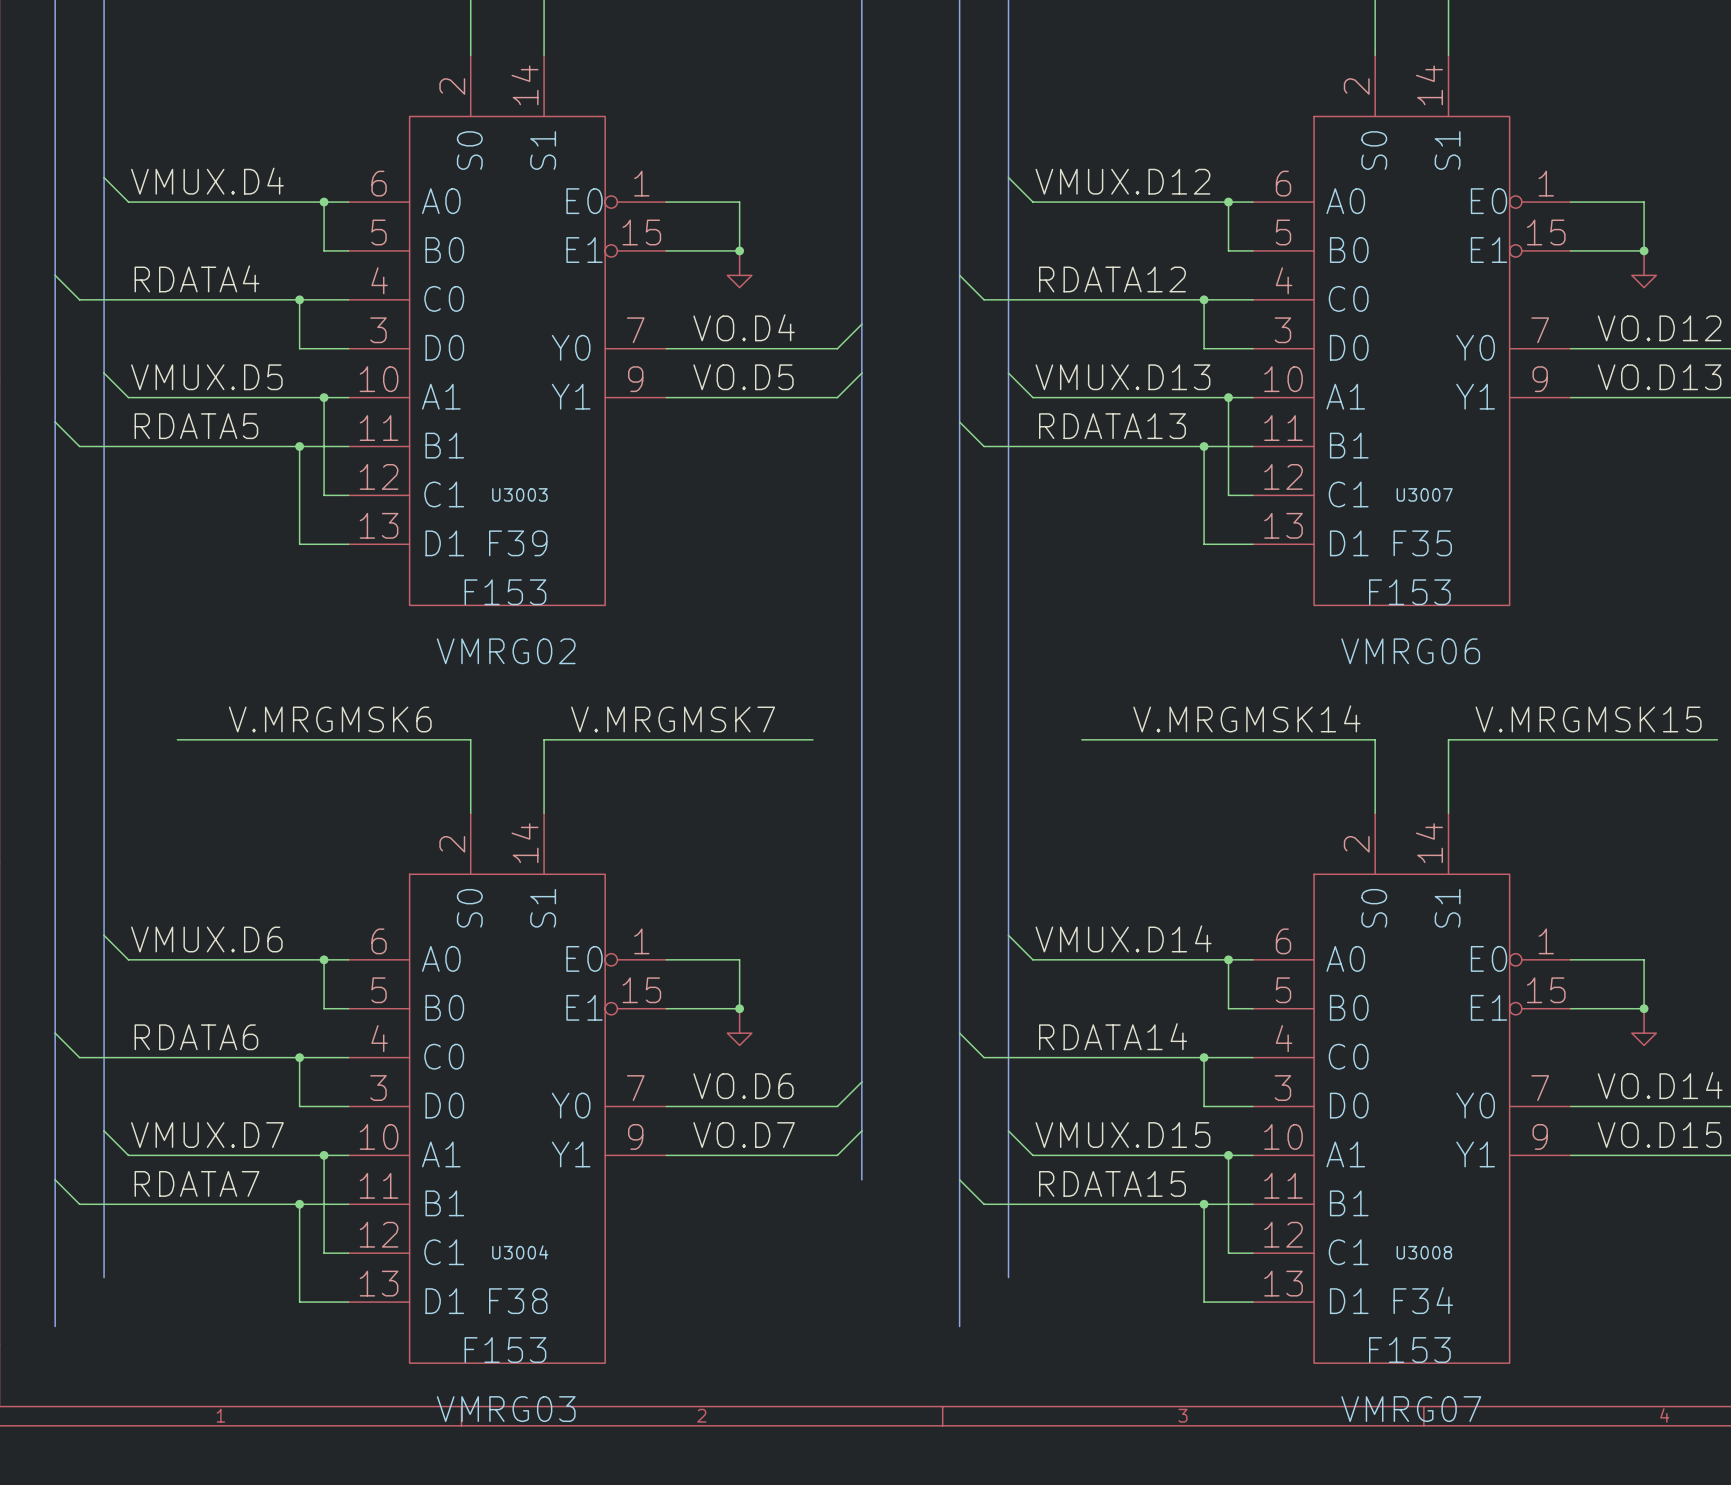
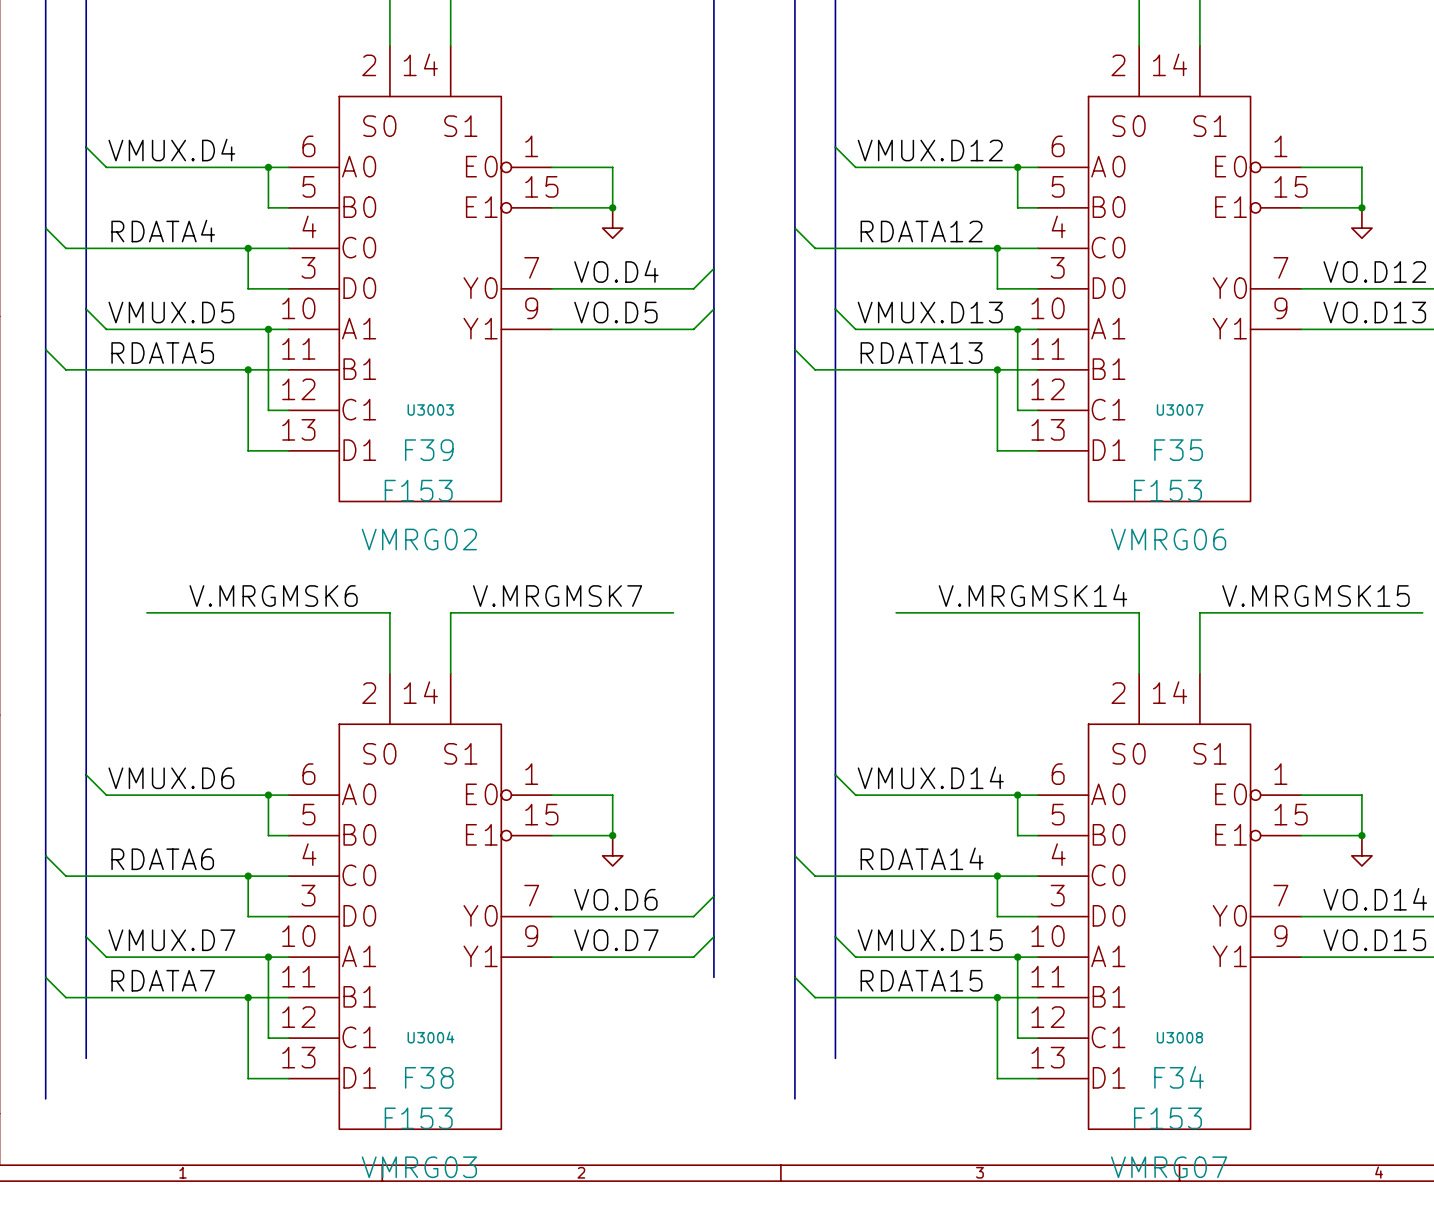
U3003 symbol: [348, 55, 667, 606] -> [288, 45, 552, 502]
U3007 symbol: [1252, 55, 1571, 606] -> [1037, 45, 1302, 502]
U3004 symbol: [348, 813, 667, 1364] -> [288, 673, 552, 1130]
U3008 symbol: [1252, 813, 1571, 1364] -> [1037, 673, 1302, 1130]

